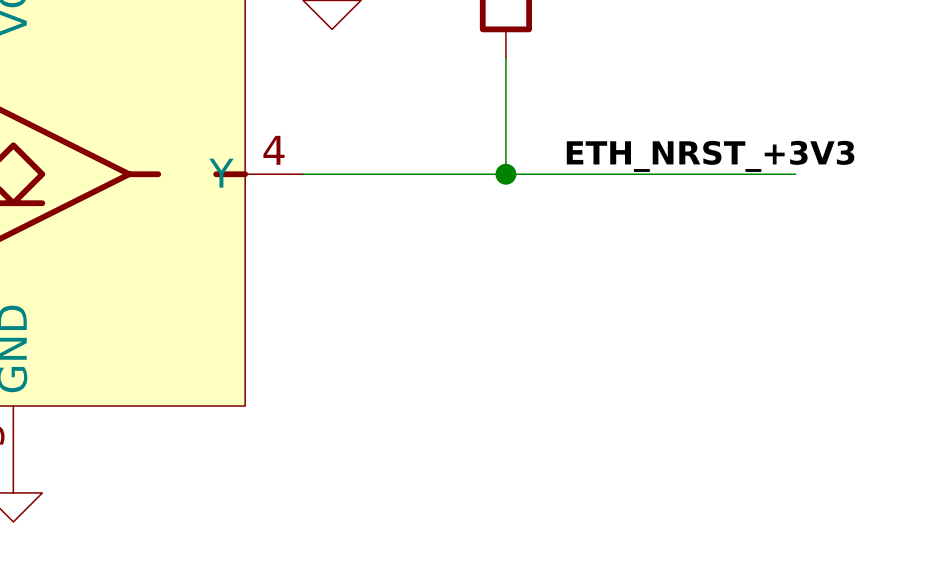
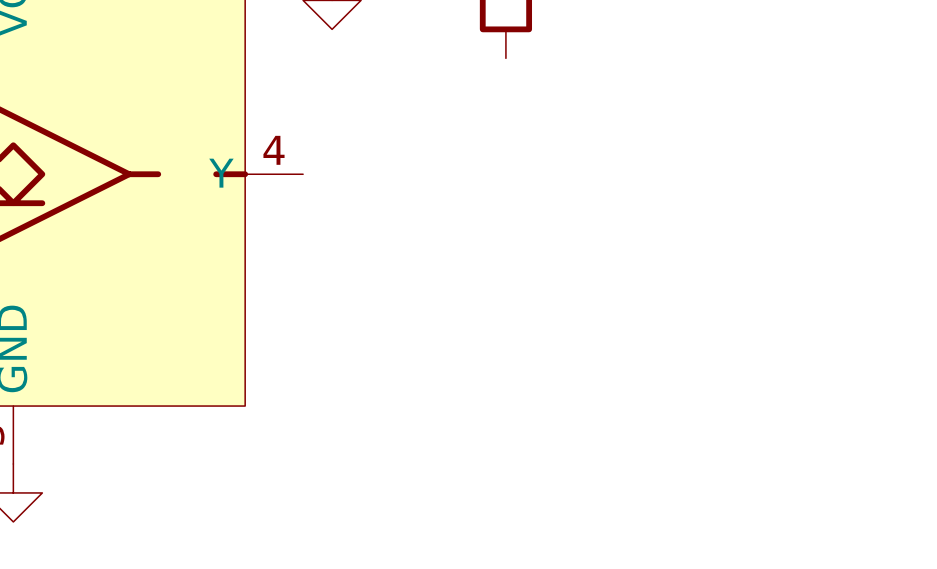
wire: (505, 58) (505, 174) -> none
label: ETH_NRST_+3V3 (710, 156) -> none
wire: (303, 174) (795, 174) -> none
junction: (505, 174) -> none

